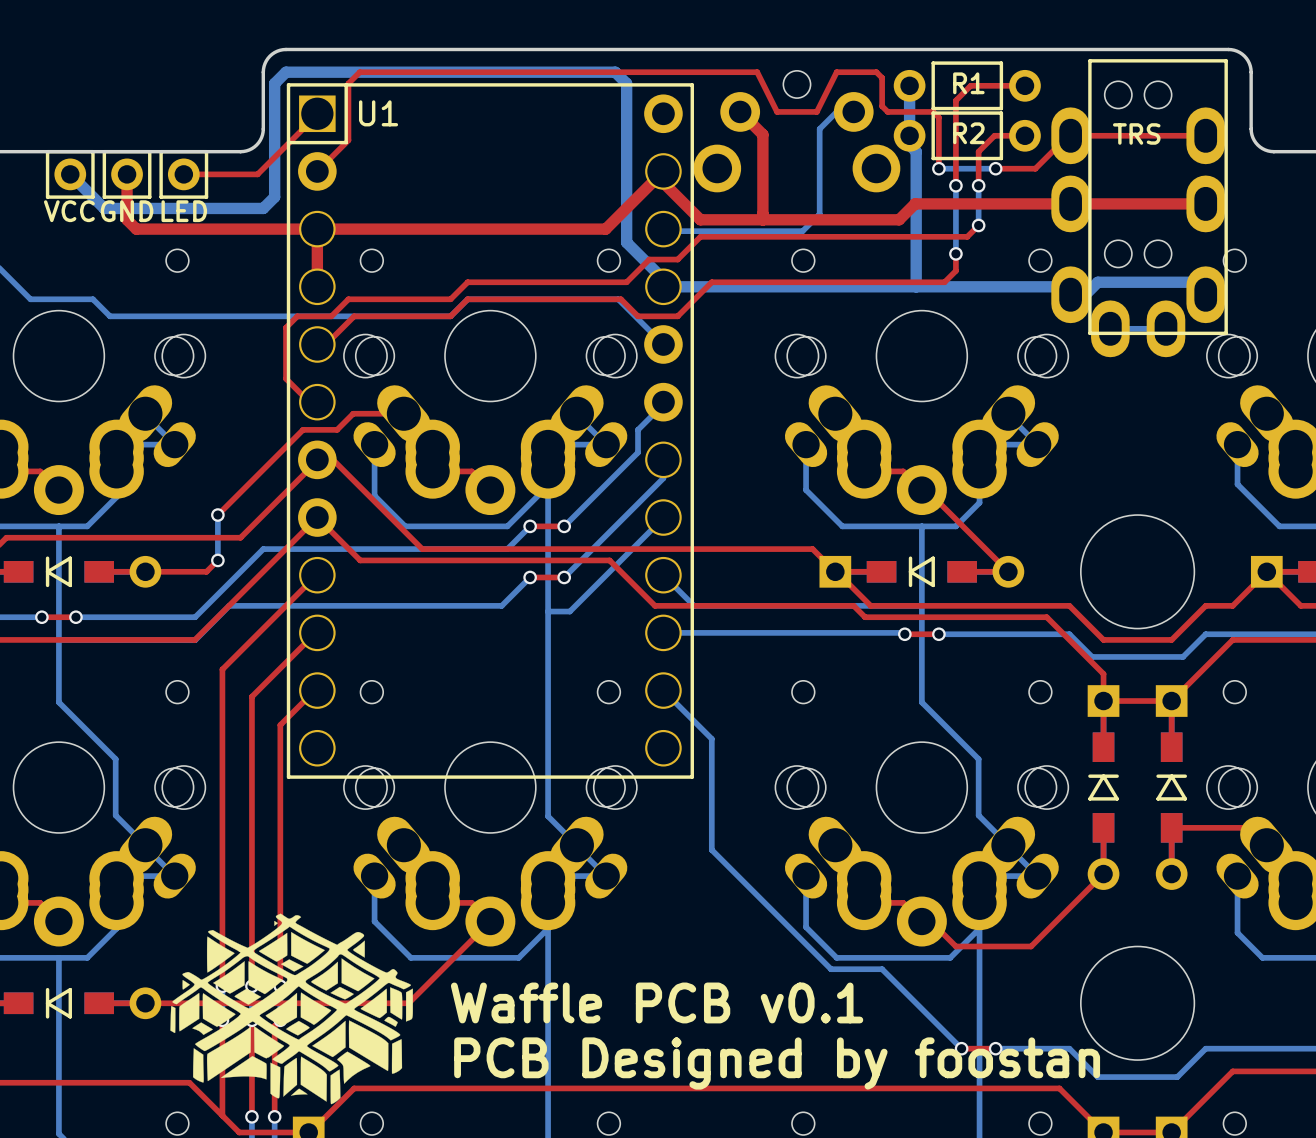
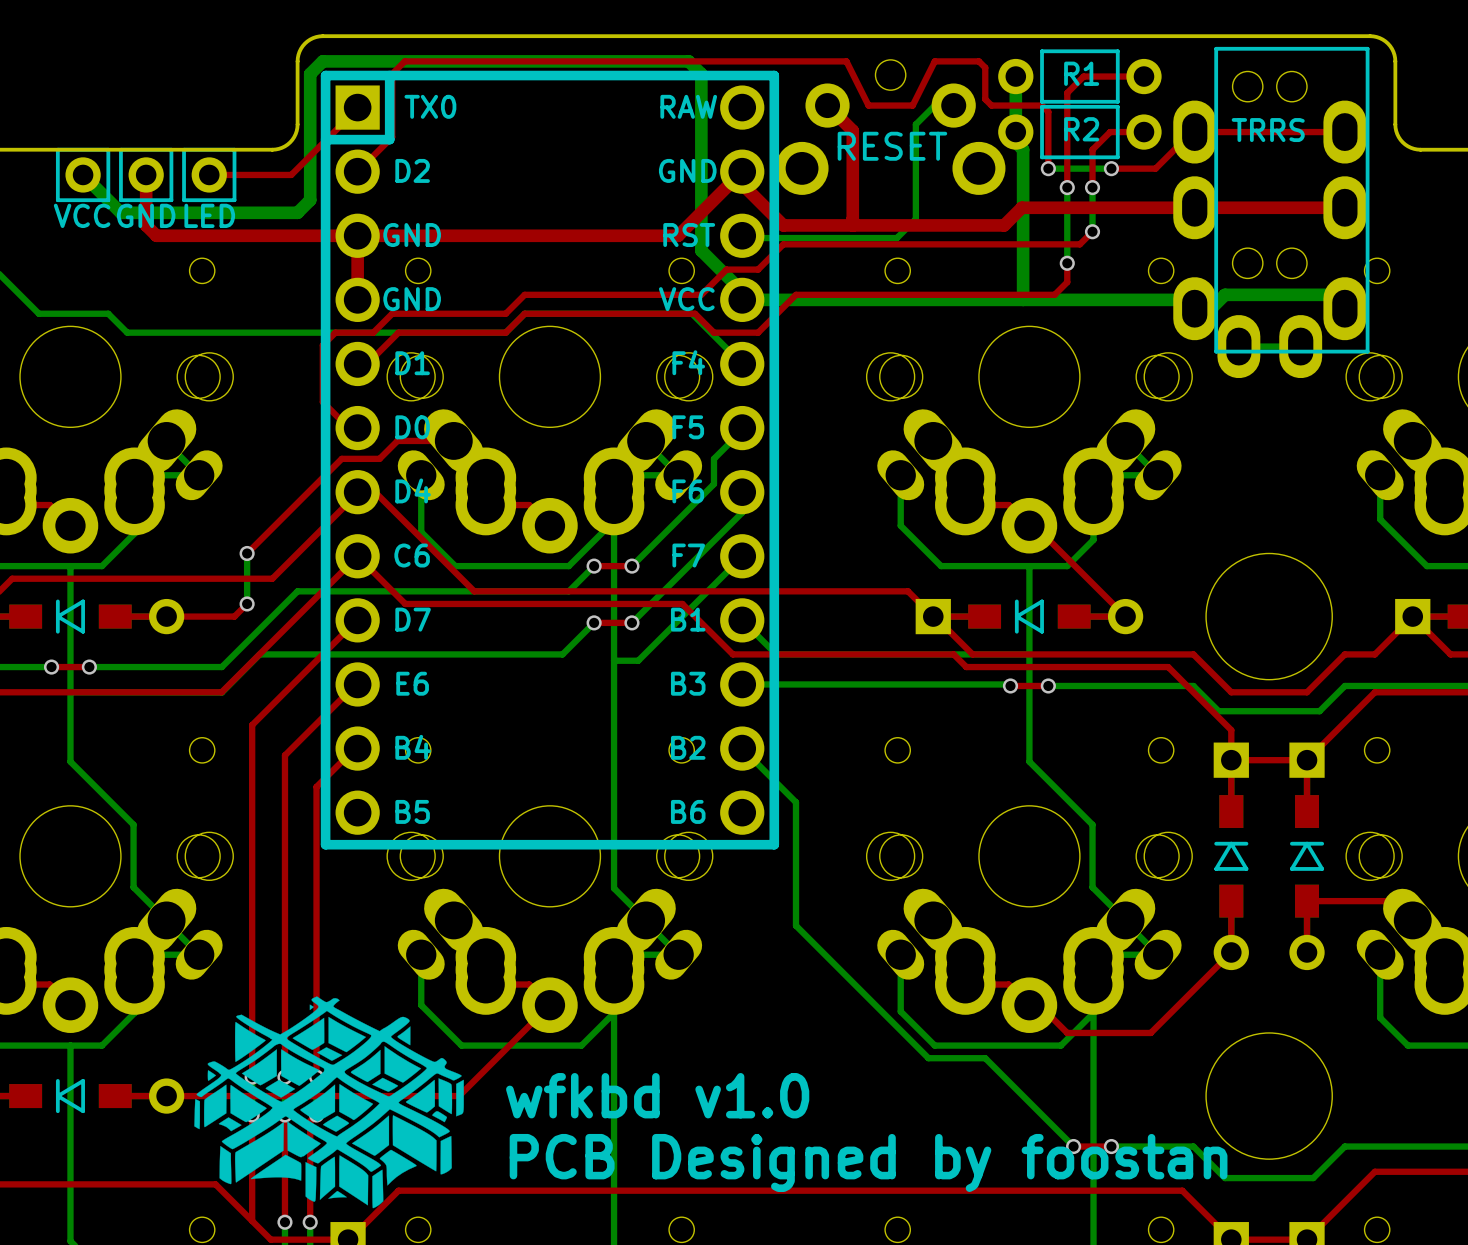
TRS name: TRS (1136, 133) -> TRRS (1268, 130)
text: none -> RESET (892, 146)
U1: (490, 431) -> none
part: none -> (549, 460)
text: Waffle PCB v0.1 (657, 1002) -> wfkbd v1.0 (657, 1095)

